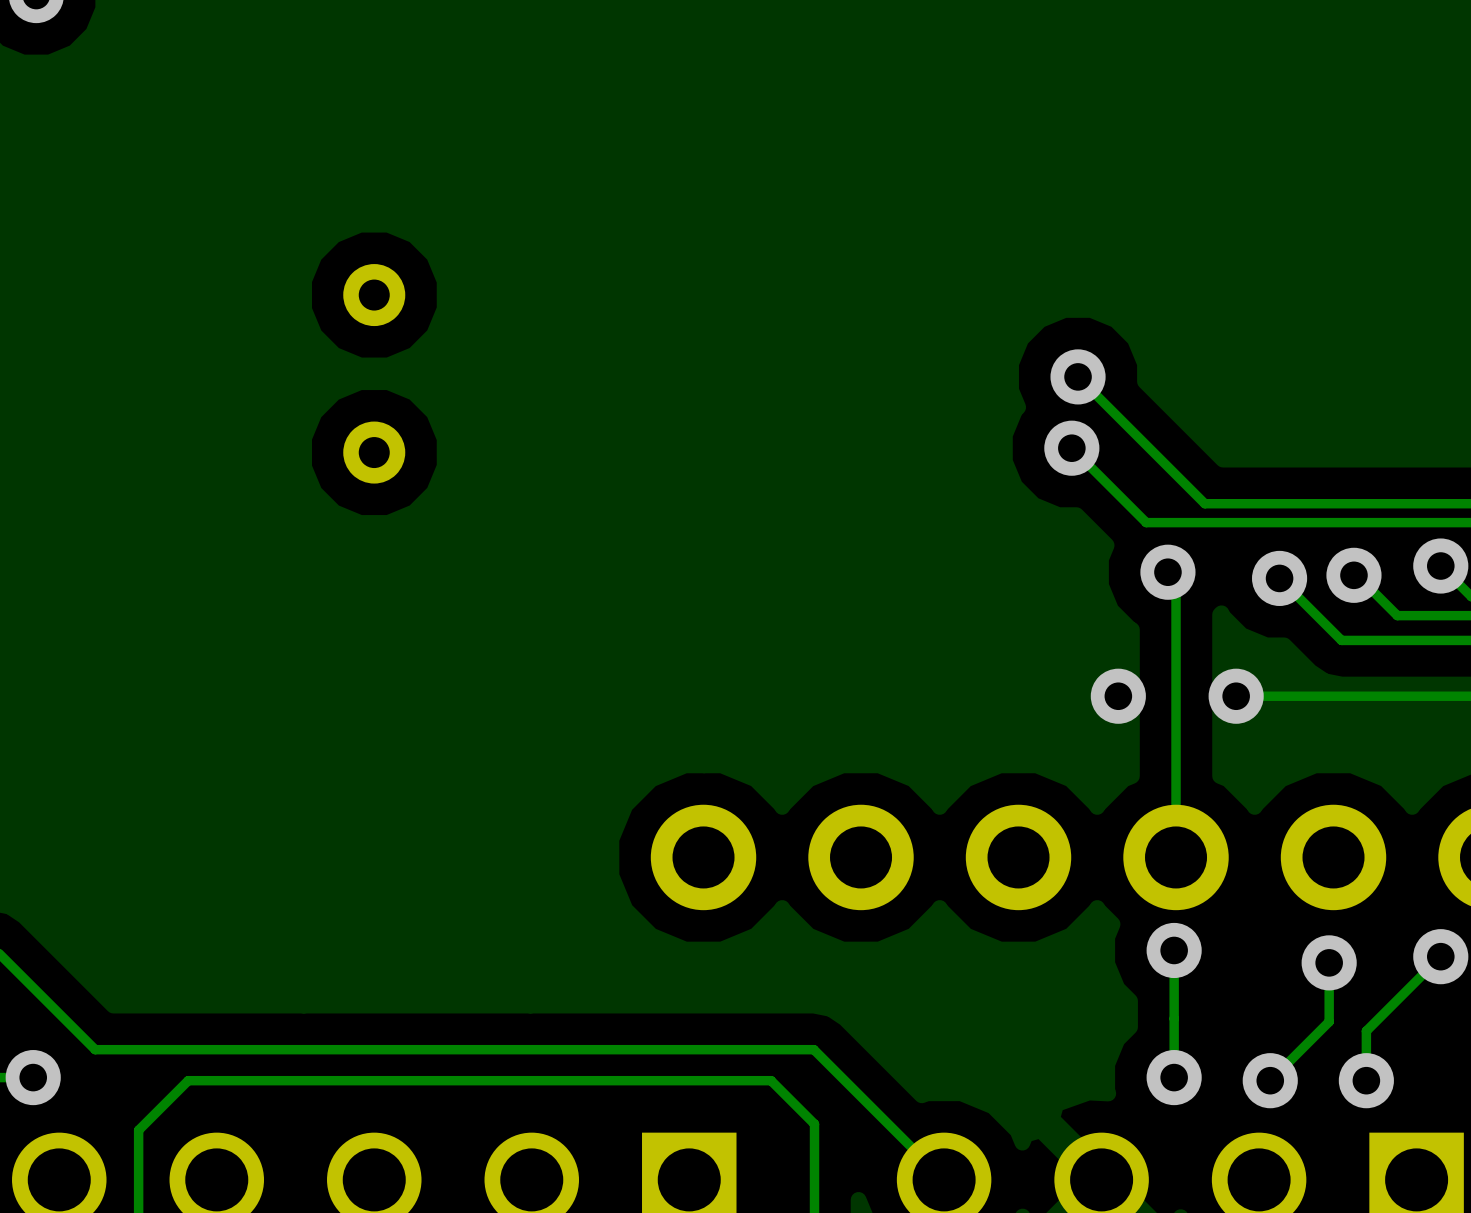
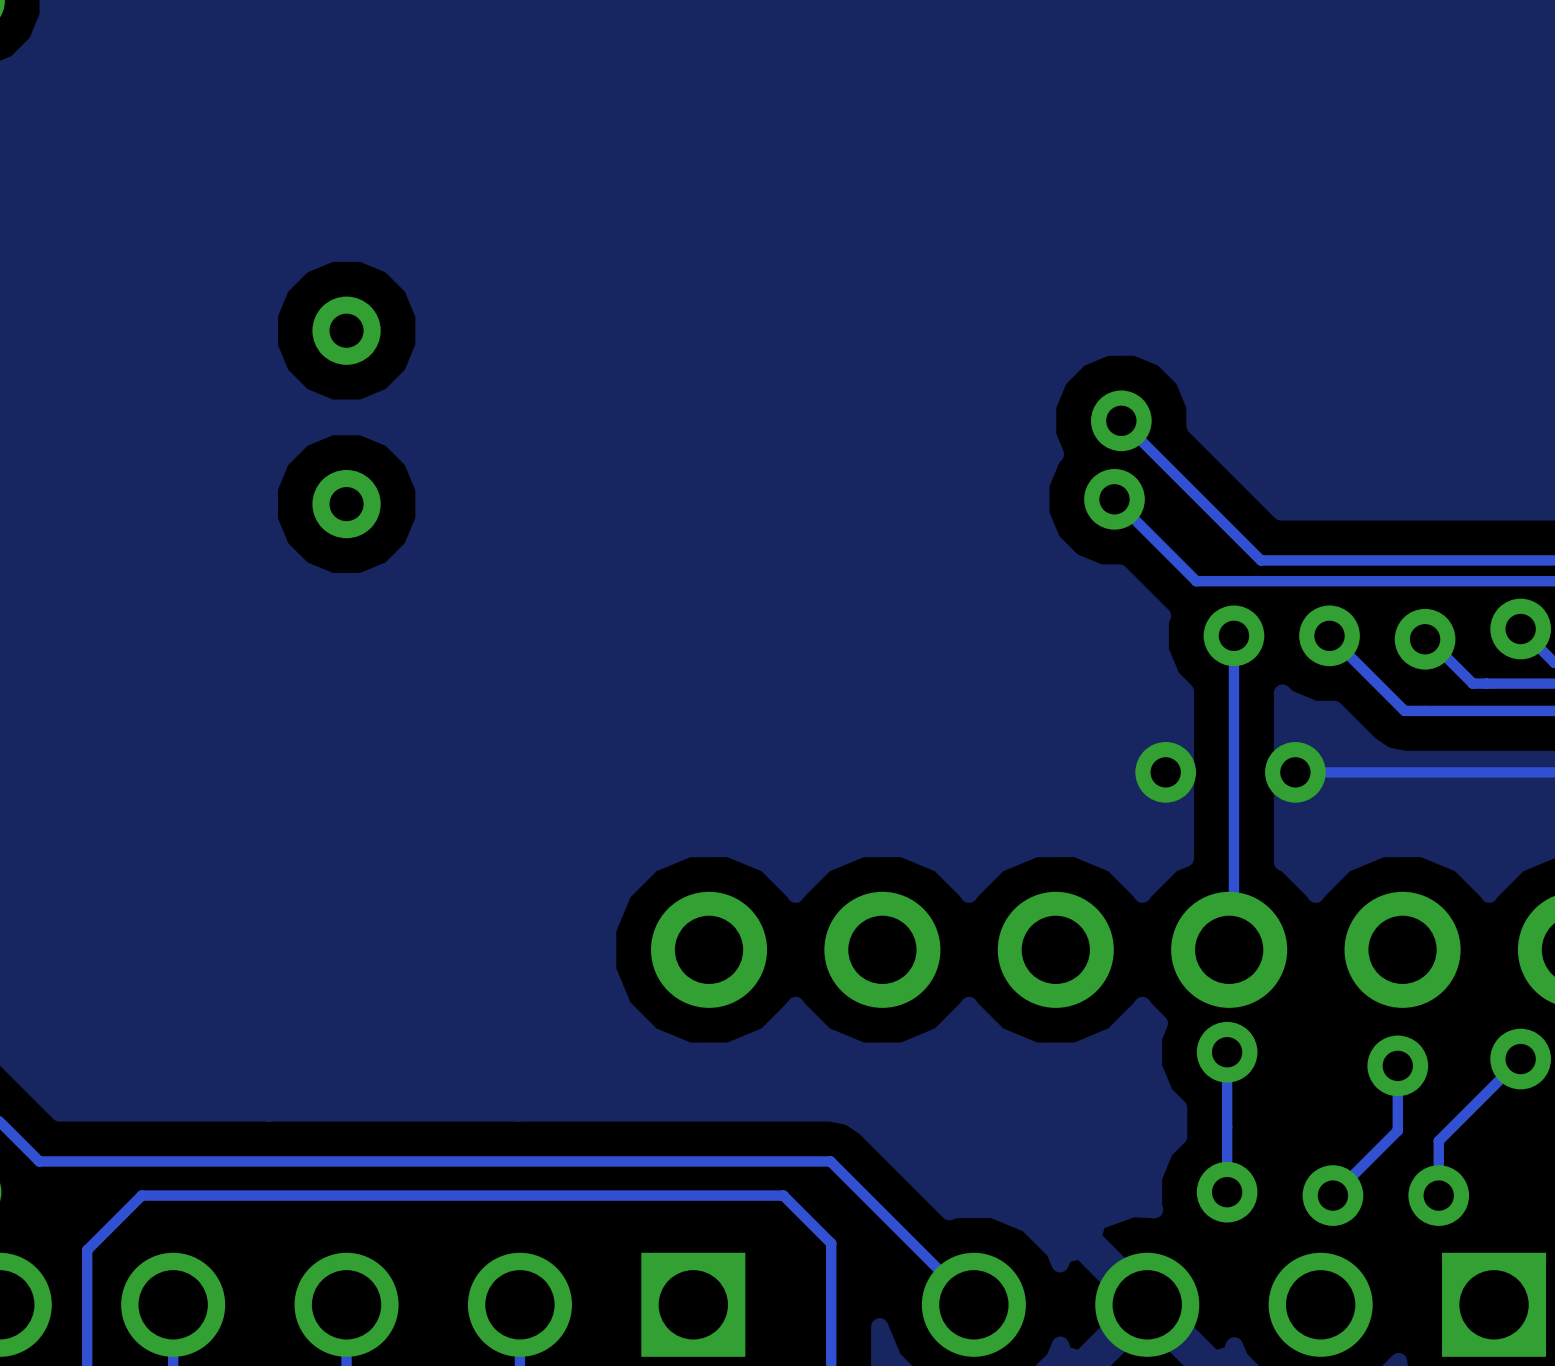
track: (1167, 572) (1176, 580) (1176, 857) -> (1233, 635) (1233, 945) (1229, 949)
via position: (1167, 572) -> (1233, 635)
track: (1279, 578) (1341, 640) -> (1329, 635) (1404, 710) (1411, 710)
via position: (1279, 578) -> (1329, 635)

